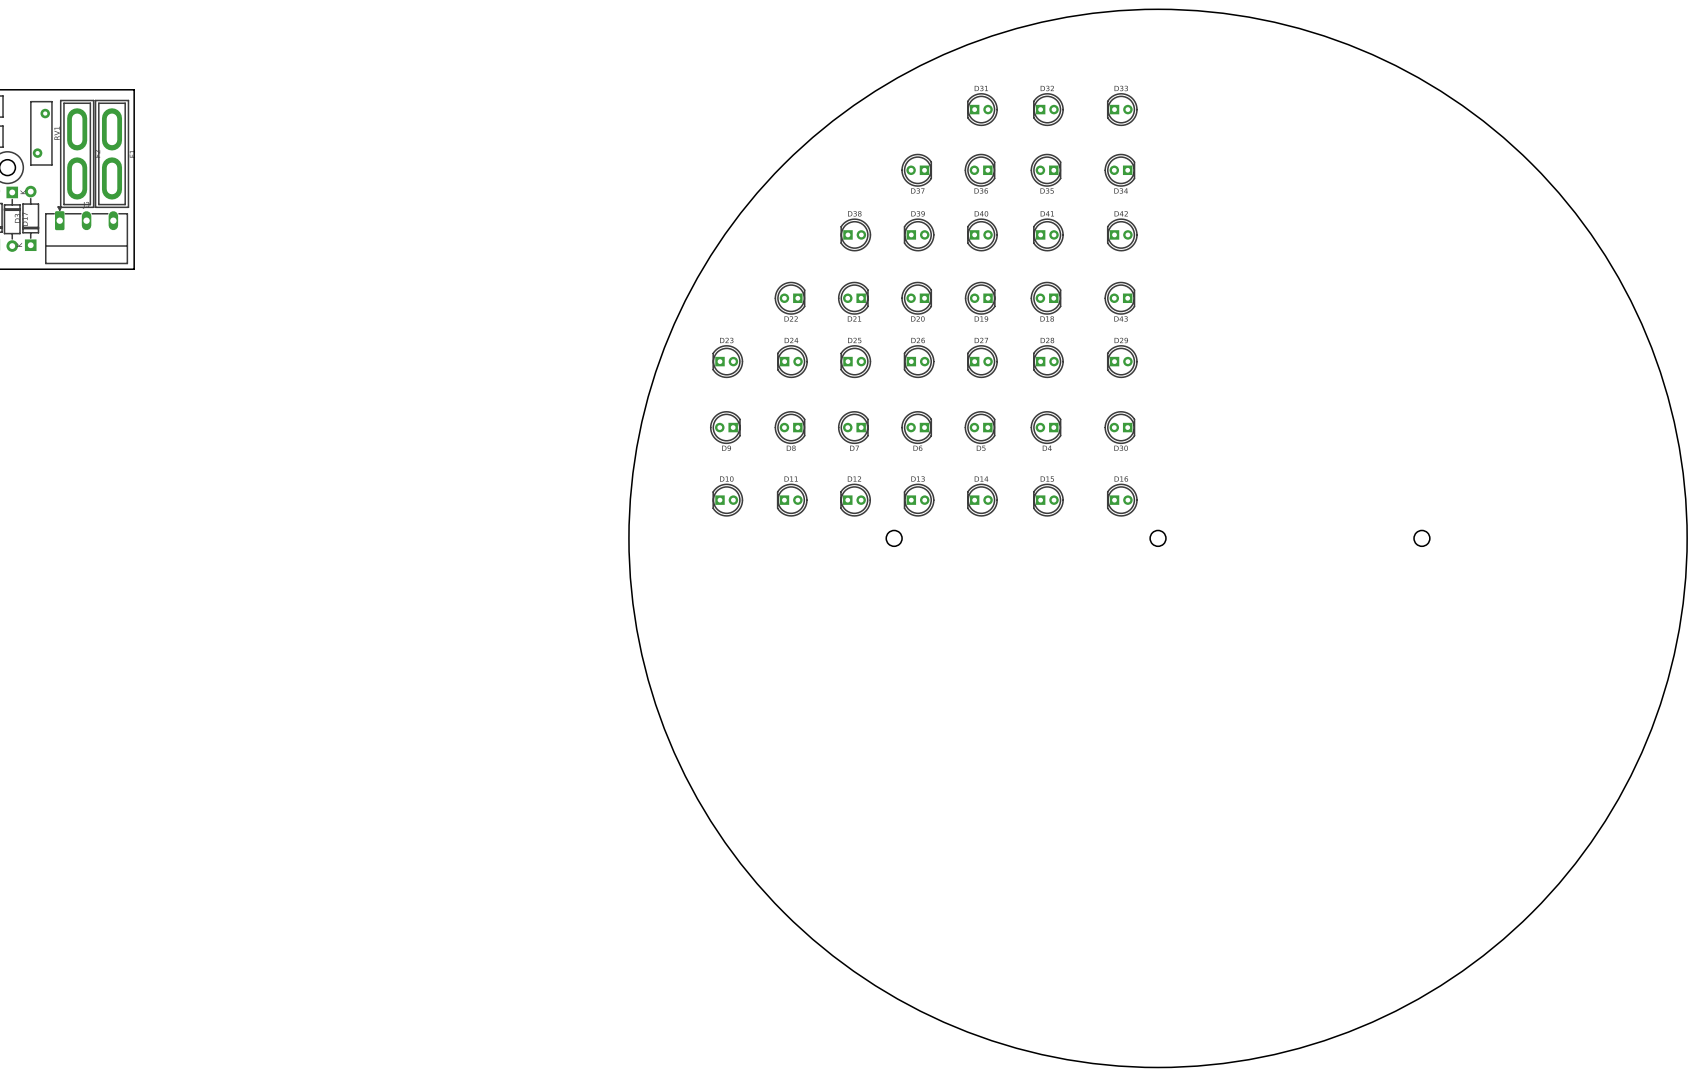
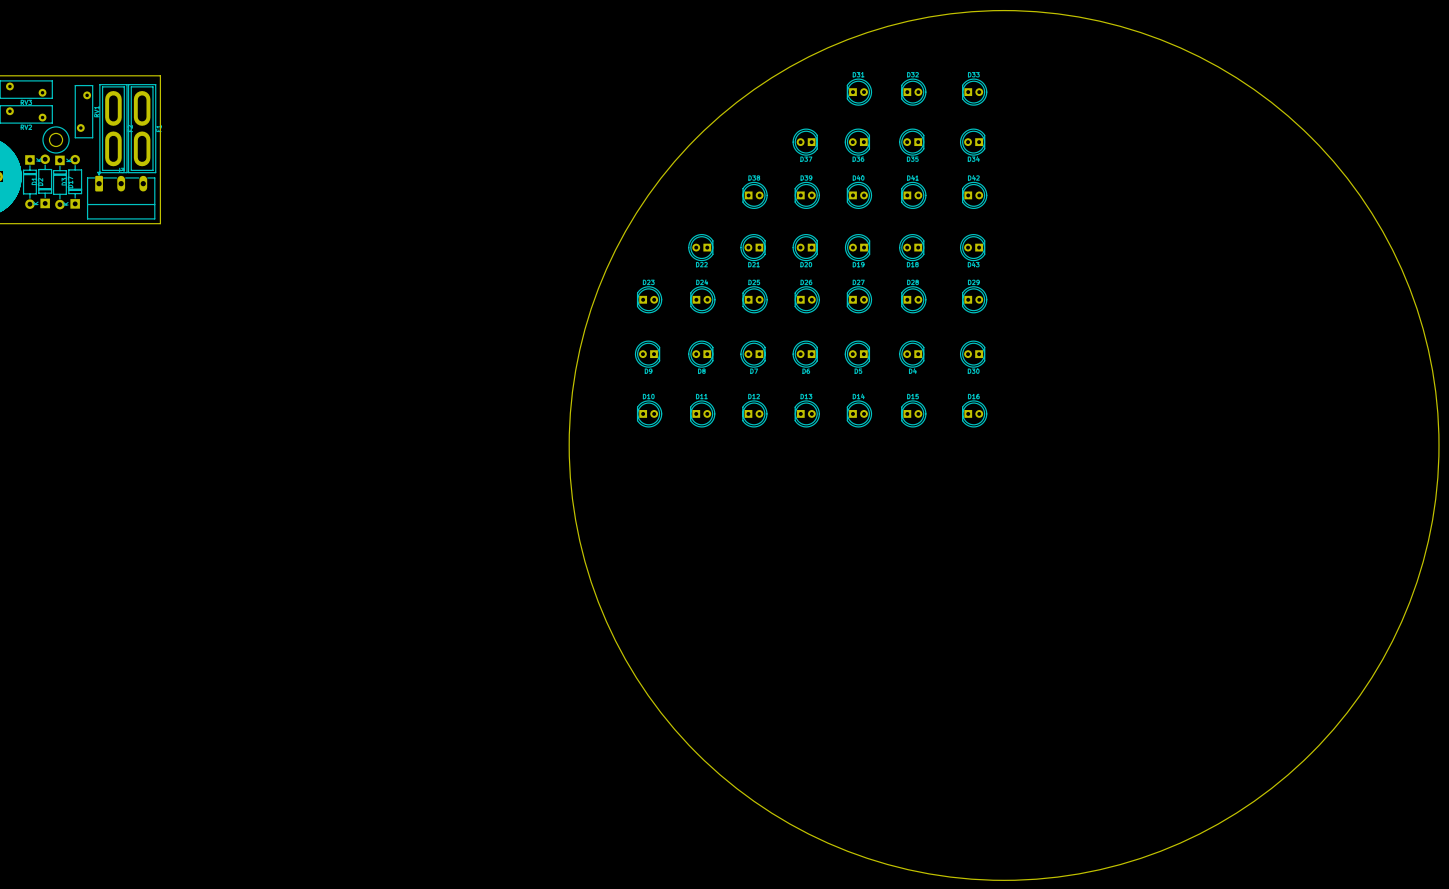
round board edge: [628, 9, 1688, 1068] -> none
round board edge: none -> [569, 10, 1440, 881]
round board edge: [886, 530, 903, 547] -> none
round board edge: [1150, 530, 1167, 547] -> none
round board edge: [1413, 530, 1430, 547] -> none

